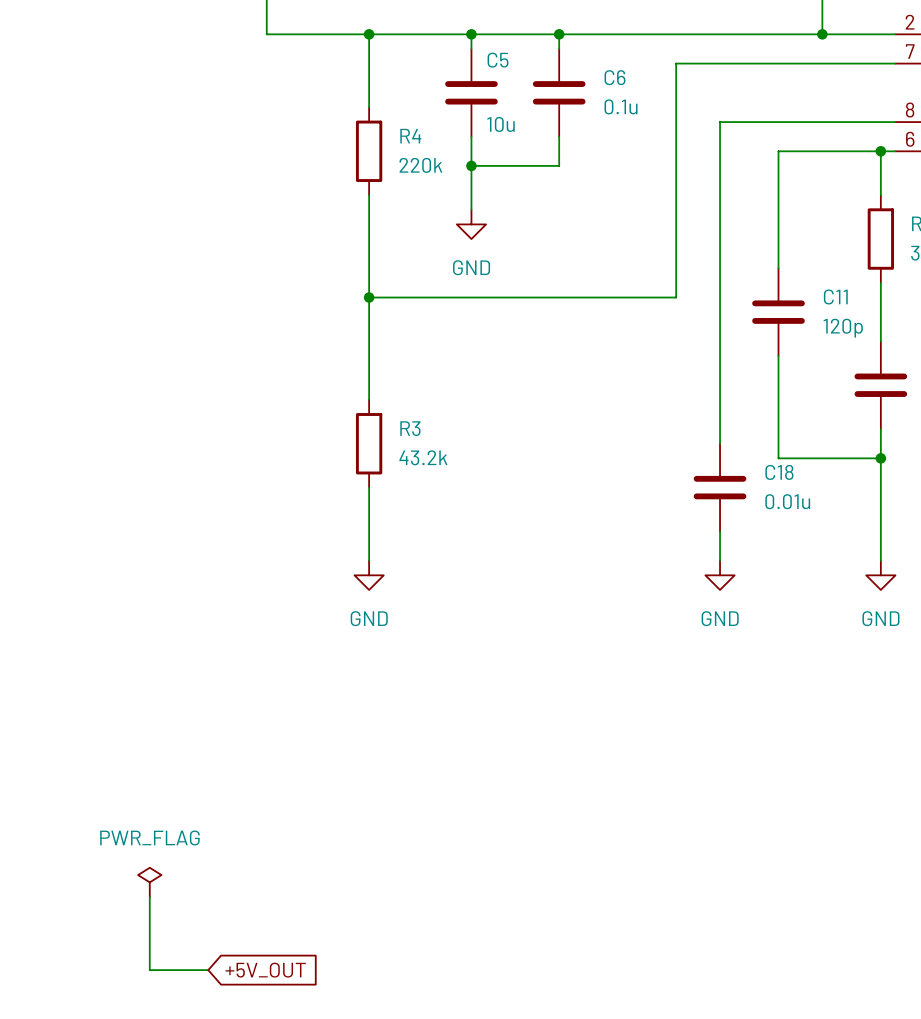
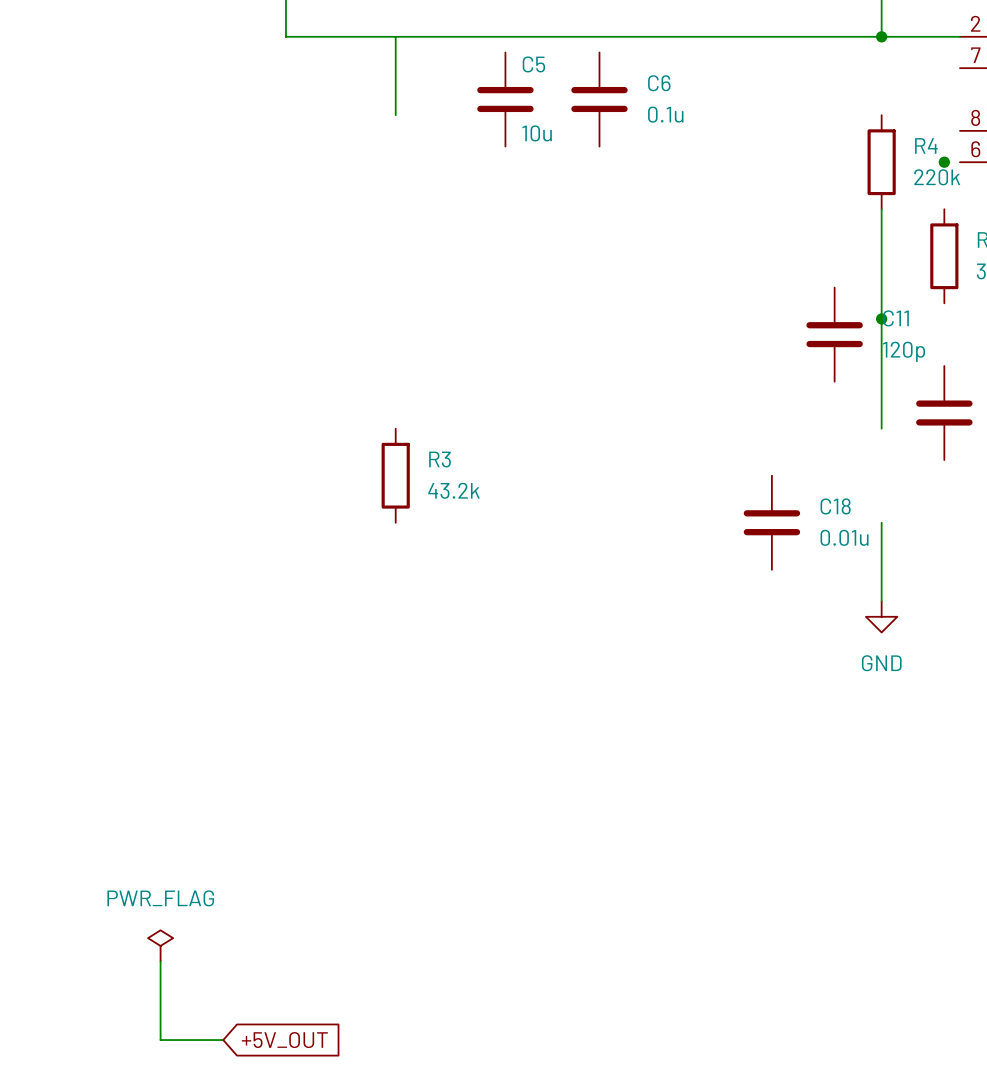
junction: (369, 34) -> none
wire: (471, 34) (471, 48) -> none
junction: (471, 34) -> none
wire: (559, 34) (559, 48) -> none
junction: (559, 34) -> none
wire: (895, 63) (676, 63) (676, 297) (369, 297) -> none
wire: (895, 122) (720, 122) (720, 443) -> none
wire: (471, 136) (471, 209) -> none
wire: (559, 136) (559, 165) (471, 165) -> none
R4 position: (369, 151) -> (881, 162)
wire: (880, 151) (880, 195) -> none
wire: (895, 151) (778, 151) (778, 268) -> none
junction: (471, 165) -> none
wire: (369, 195) (369, 399) -> none
wire: none -> (881, 209) (881, 428)
power symbol: GND (471, 224) -> none
wire: (880, 282) (880, 341) -> none
junction: (369, 297) -> none
junction: none -> (881, 318)
wire: (778, 356) (778, 458) (880, 458) -> none
wire: (880, 429) (880, 560) -> none
junction: (880, 458) -> none
wire: (369, 487) (369, 560) -> none
wire: none -> (881, 522) (881, 601)
wire: (720, 531) (720, 560) -> none
power symbol: GND (369, 575) -> none
power symbol: GND (720, 575) -> none
power symbol: none -> GND (881, 616)
power symbol: GND (880, 575) -> none

